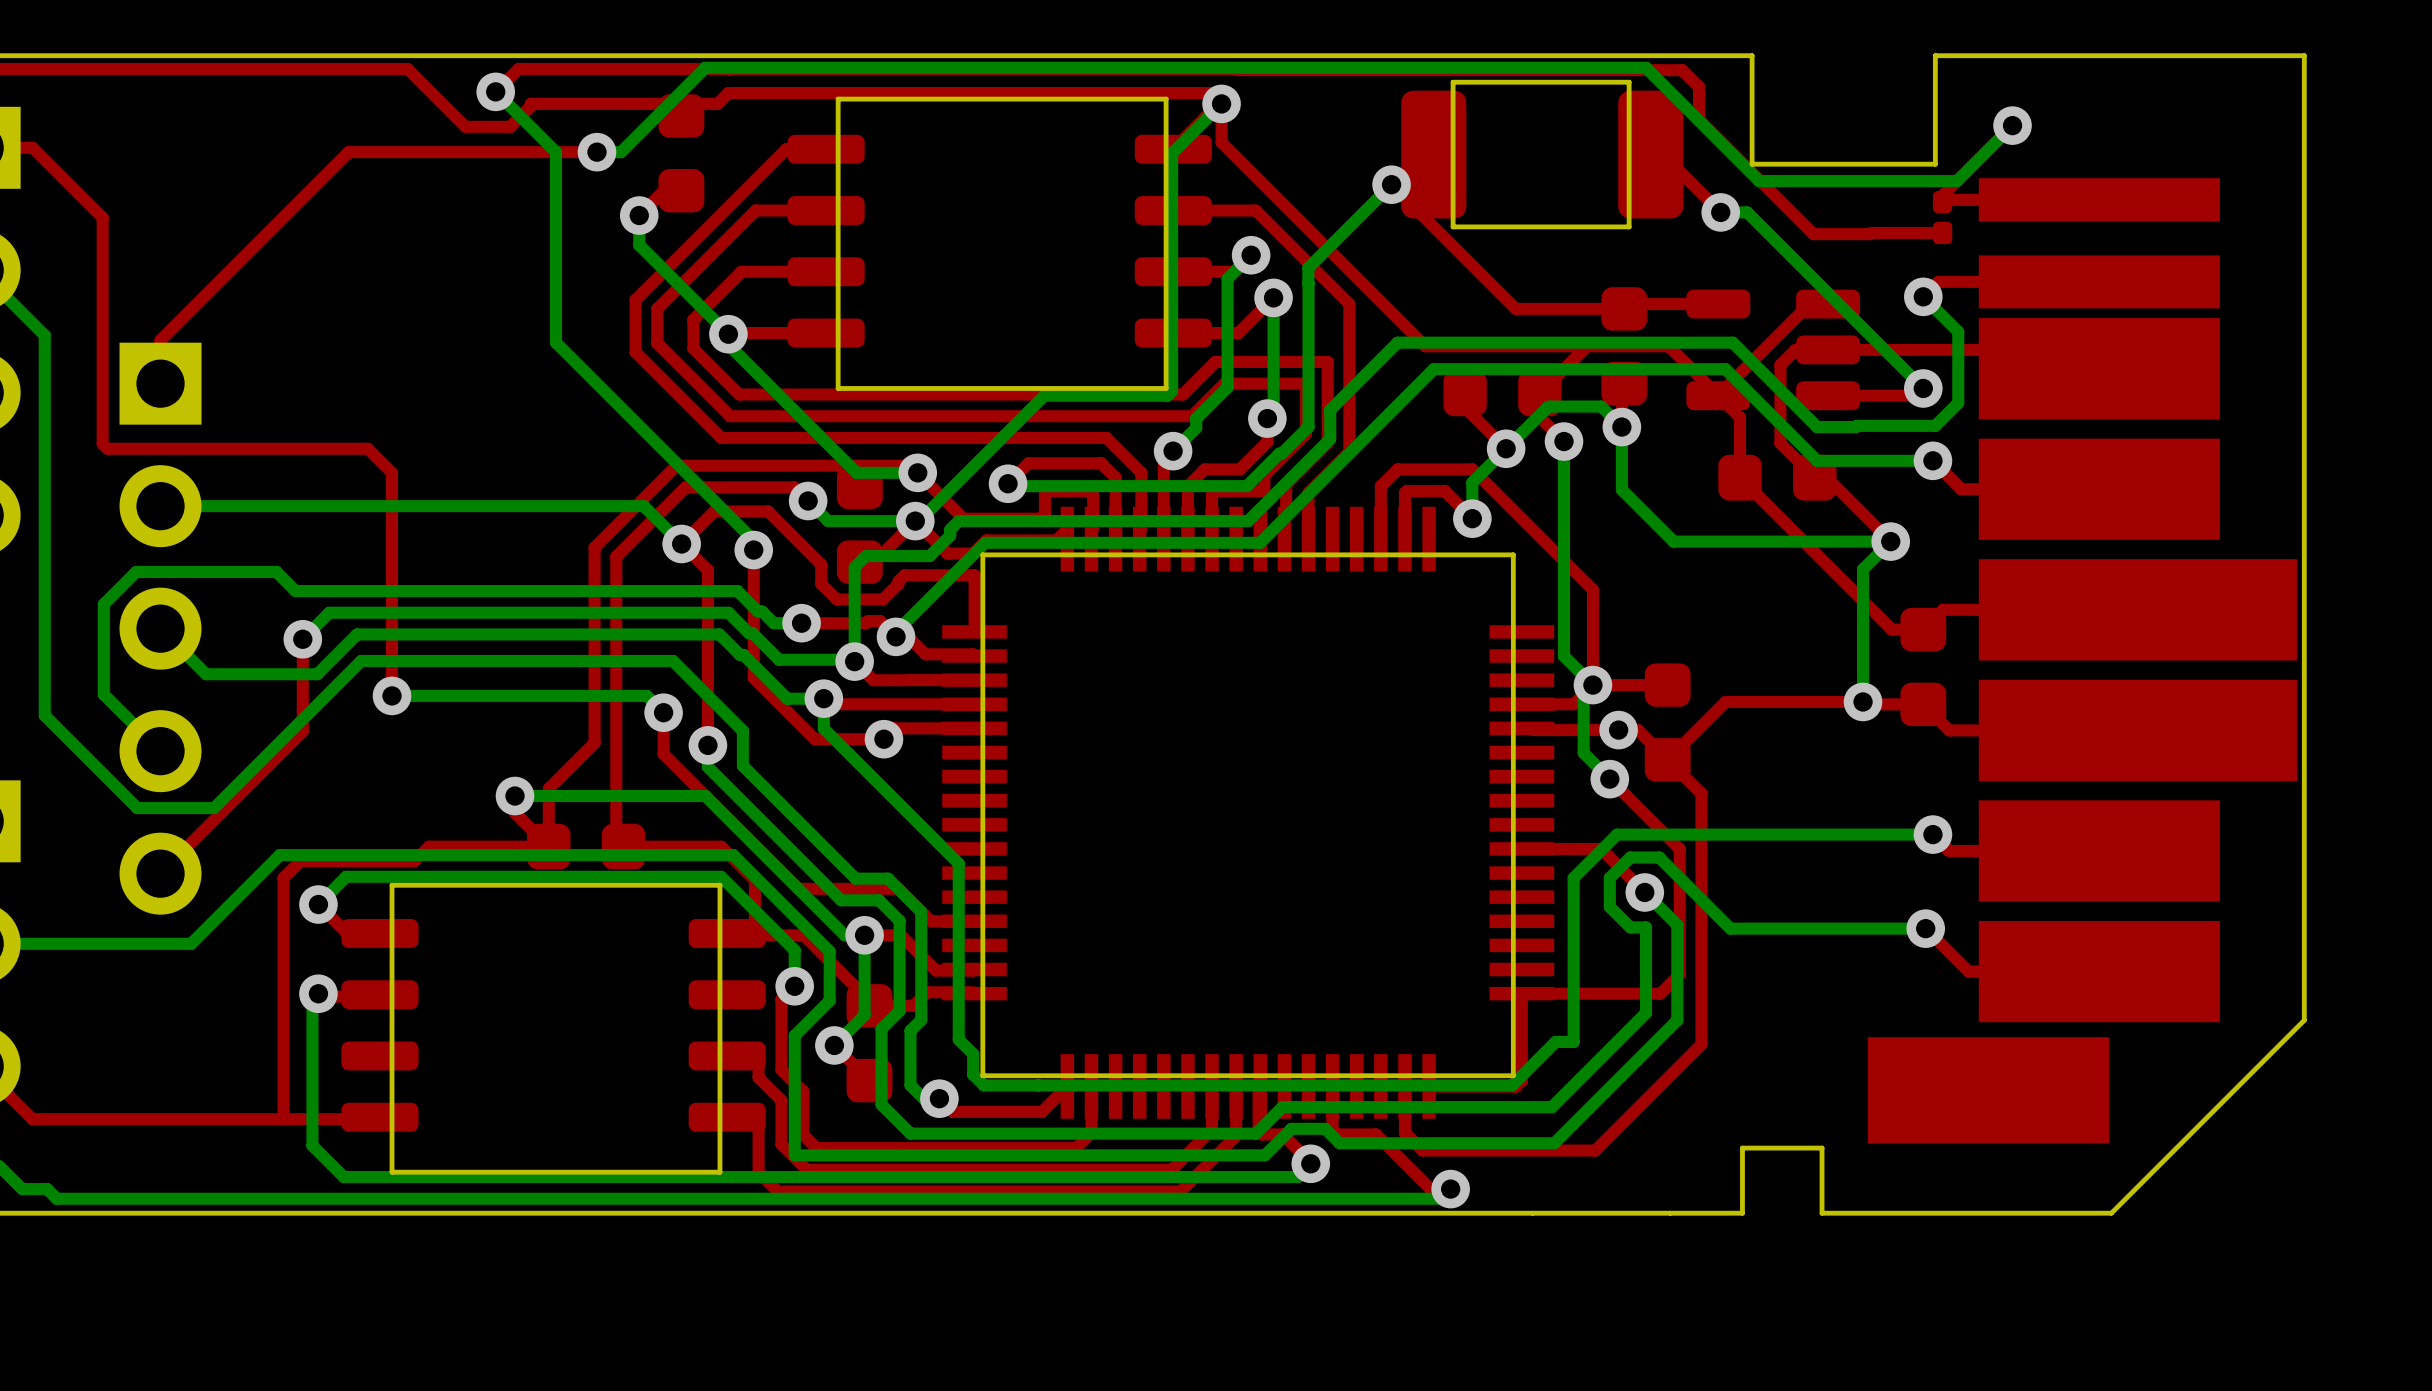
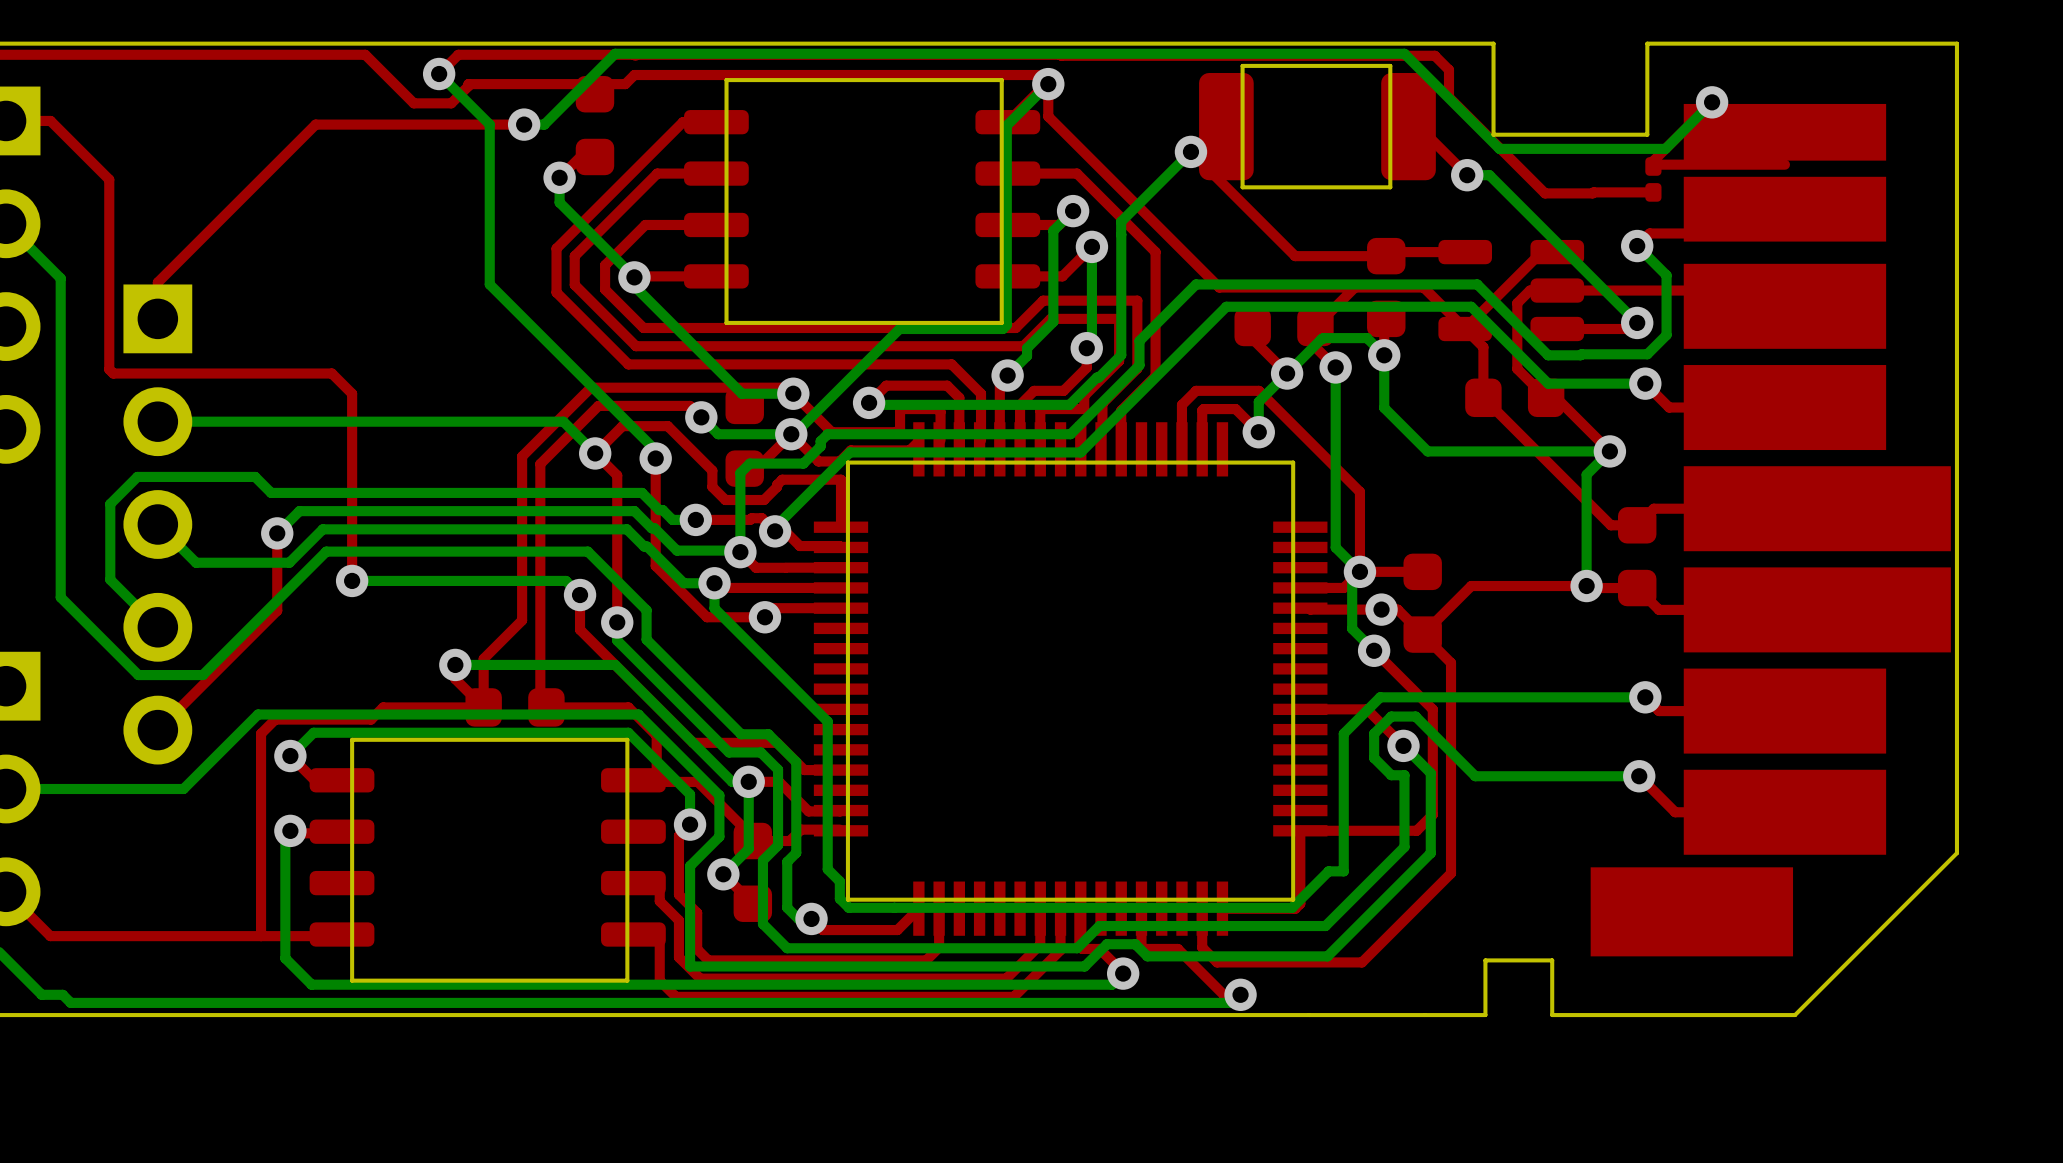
part footprint: [1867, 178, 2298, 1144] -> [1590, 103, 1951, 957]

